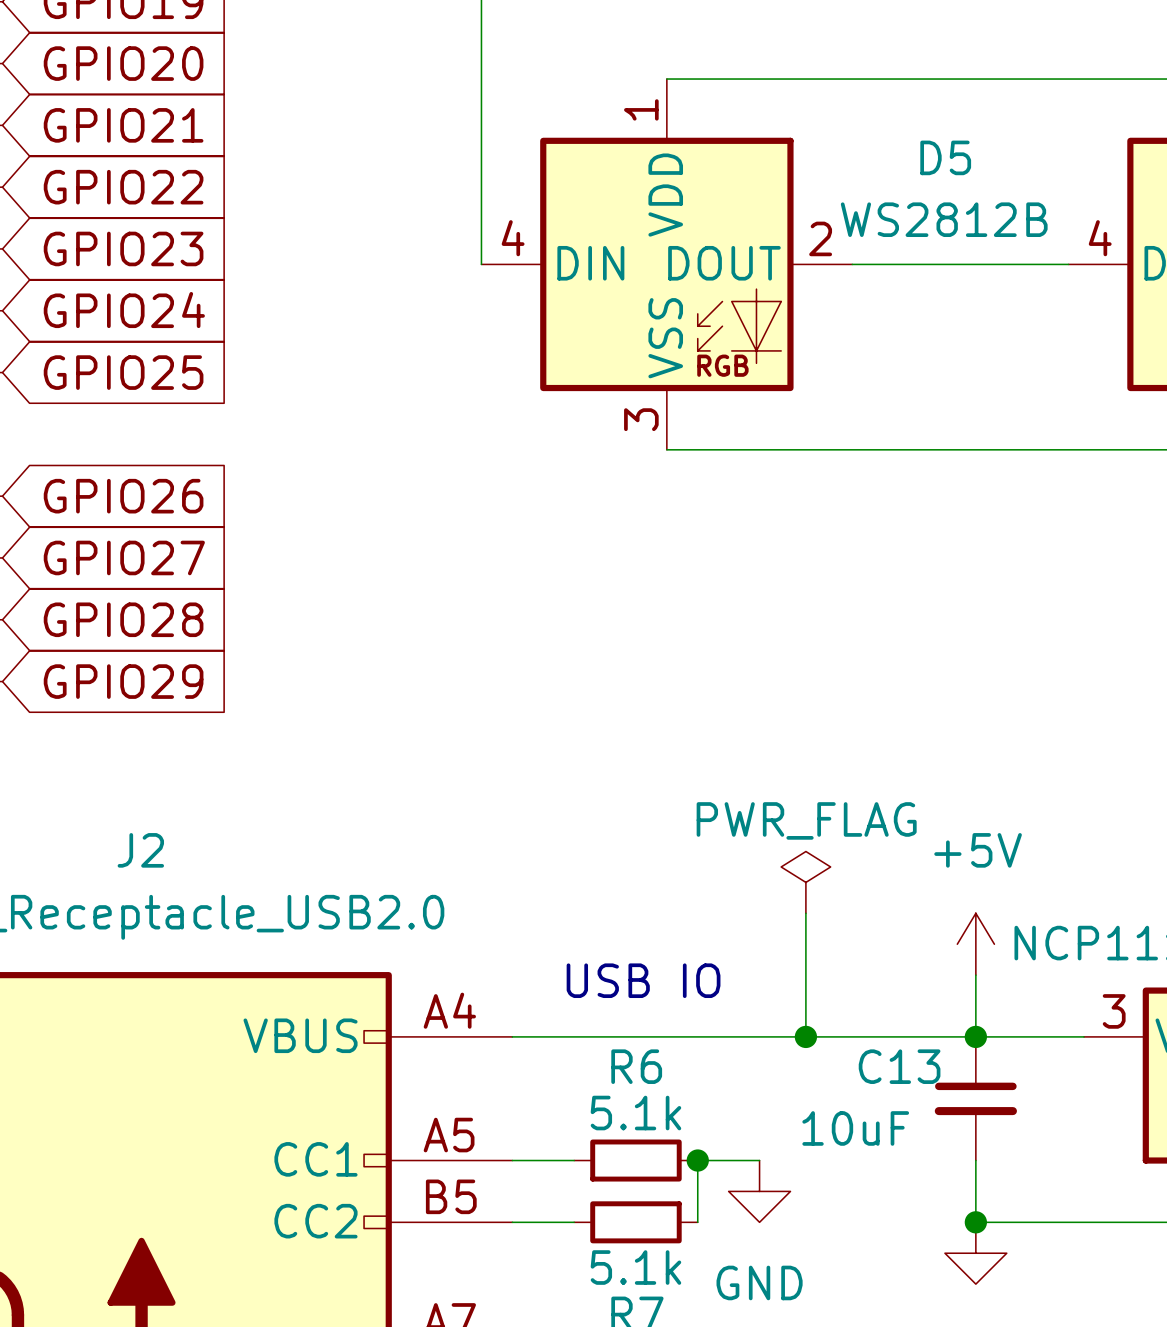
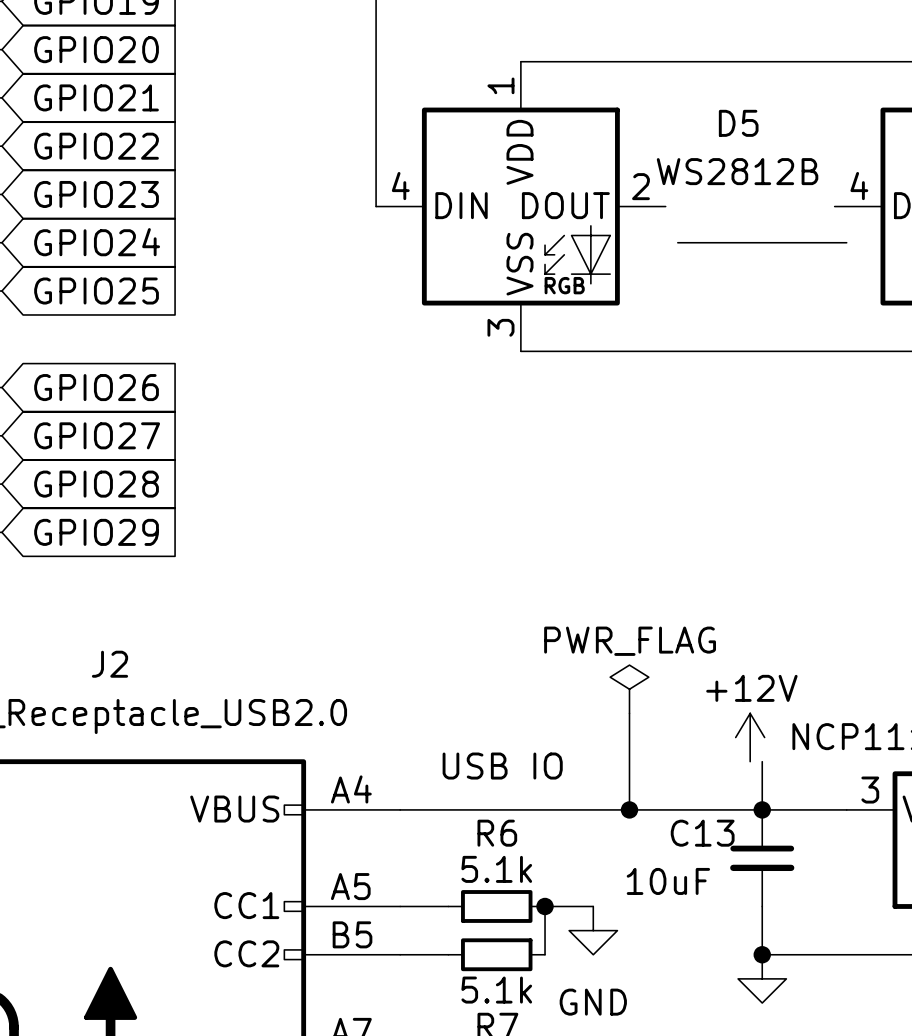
wire: (852, 264) (1068, 264) -> (677, 242) (846, 242)
power symbol: +5V (975, 944) -> +12V (750, 737)

